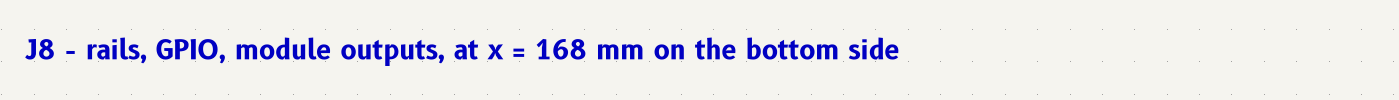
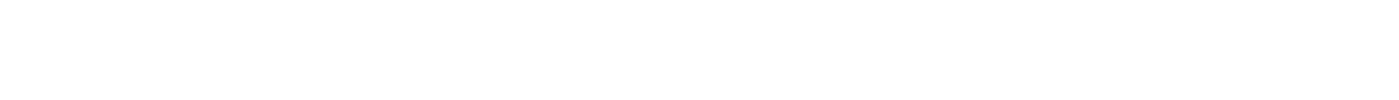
text: J8 - rails, GPIO, module outputs, at x = 168 mm on the bottom side (461, 51) -> none

